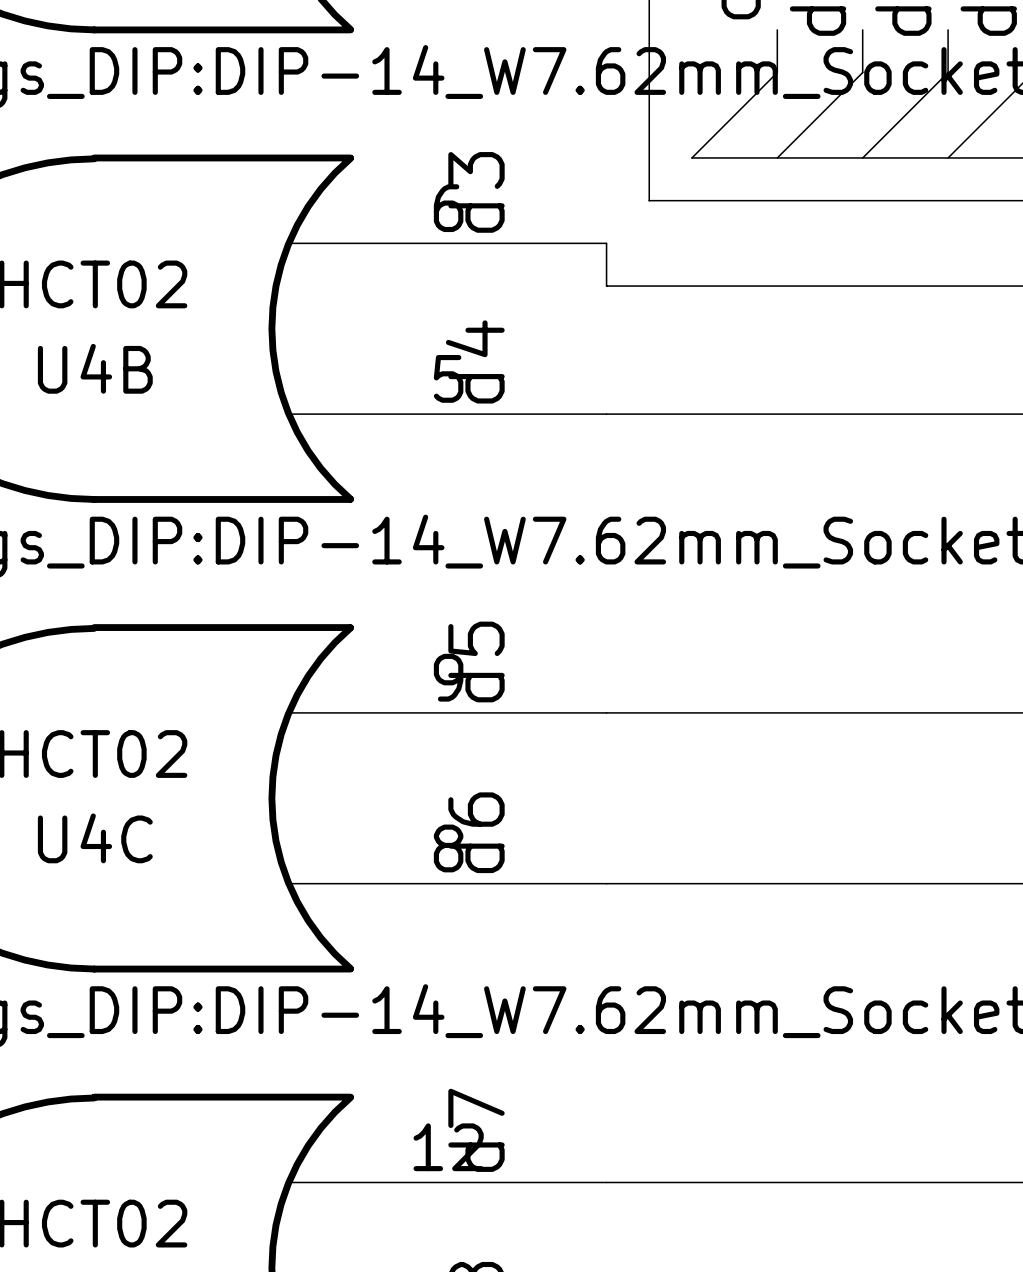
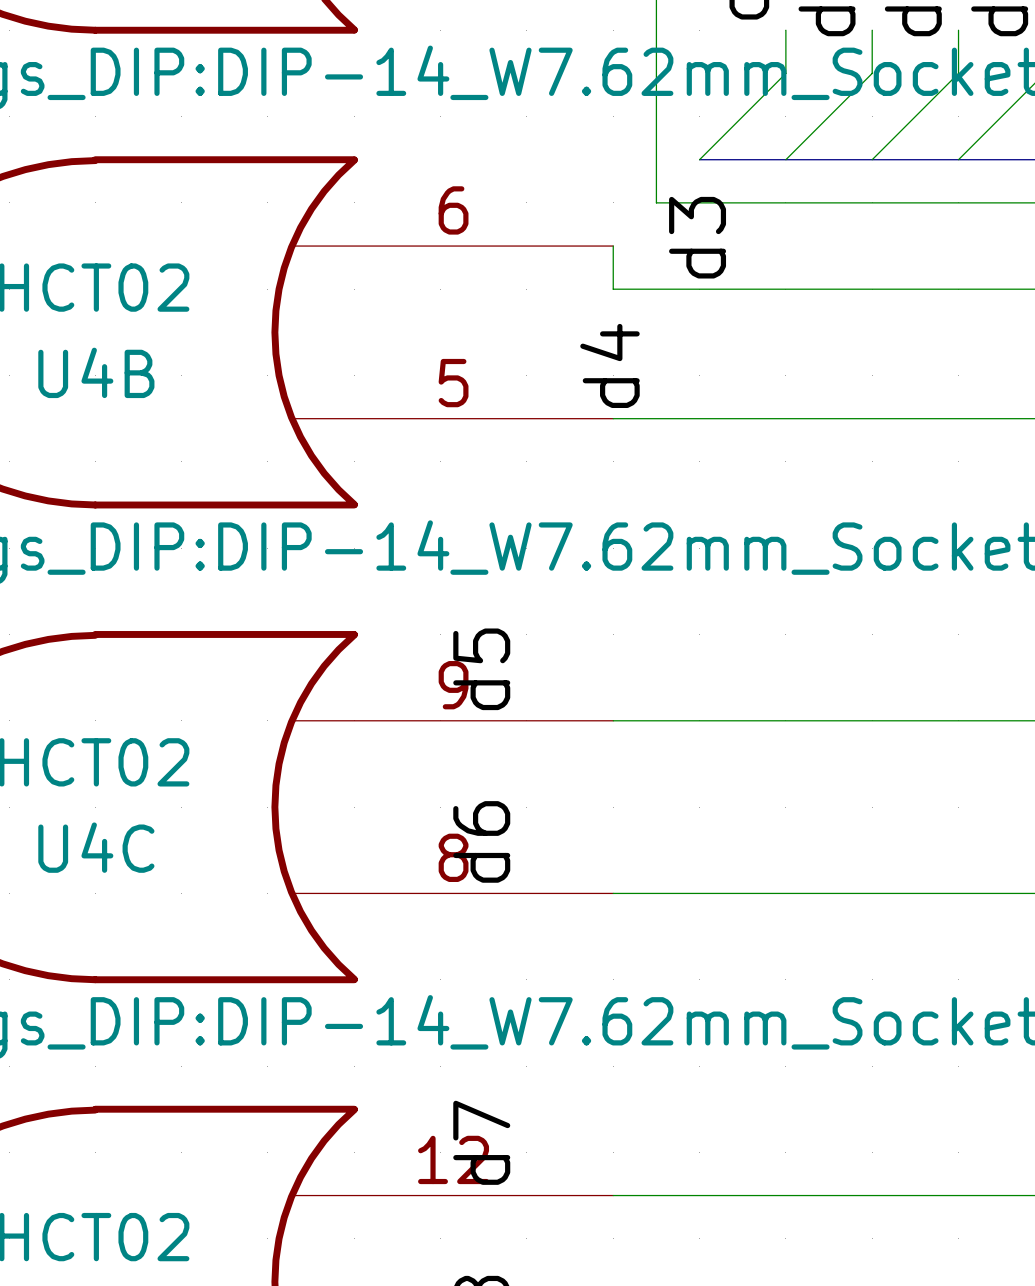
label position: d3 (476, 192) -> d3 (697, 237)
label position: d4 (475, 361) -> d4 (610, 365)

